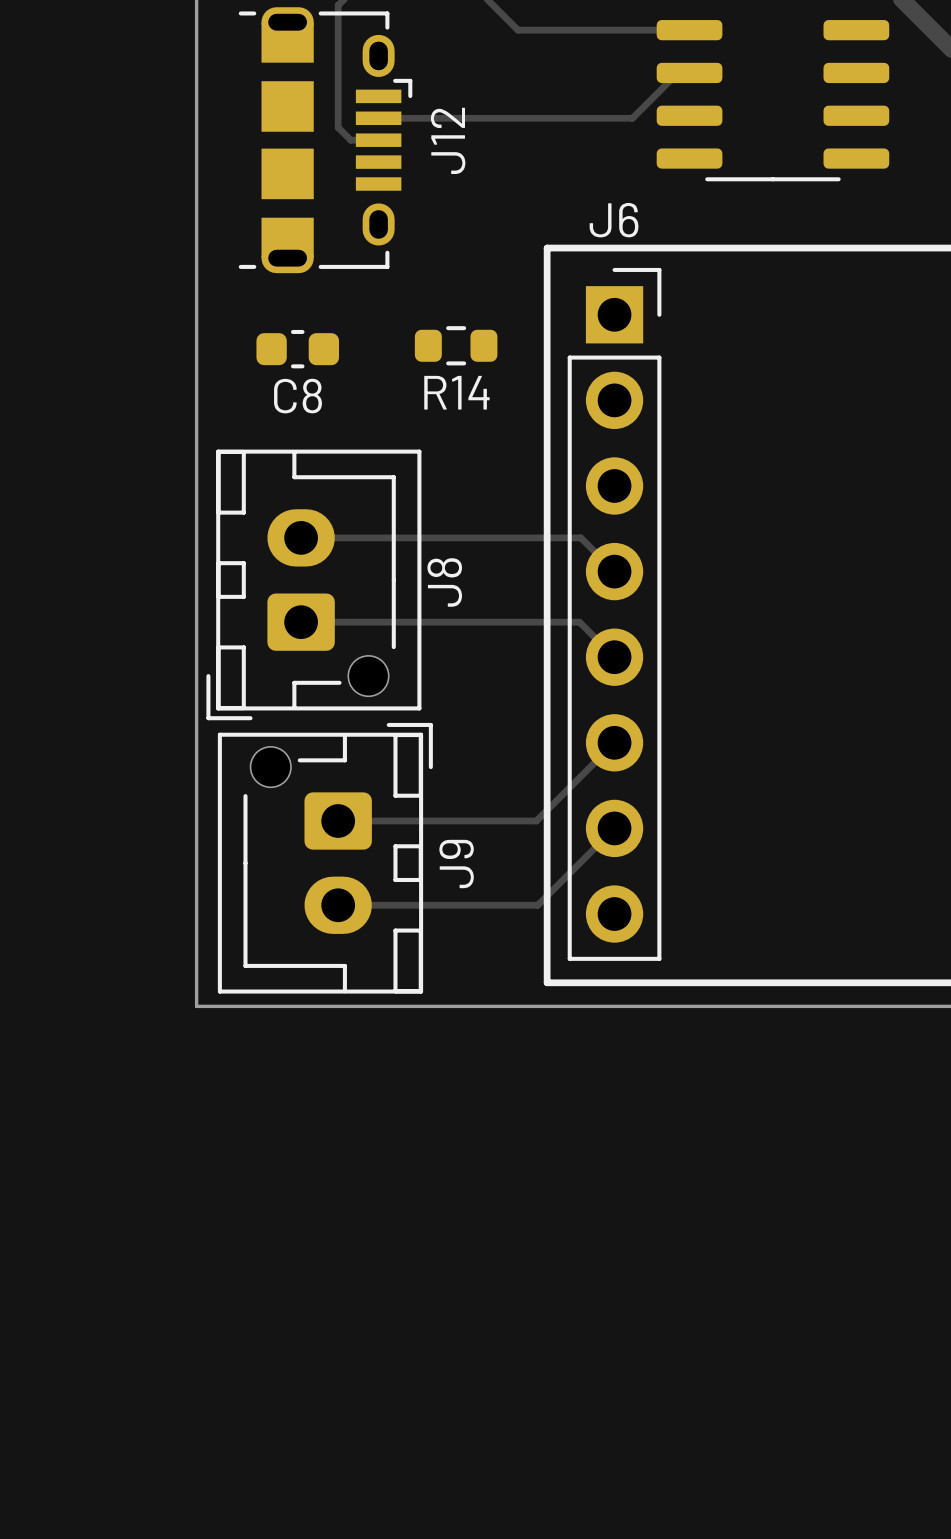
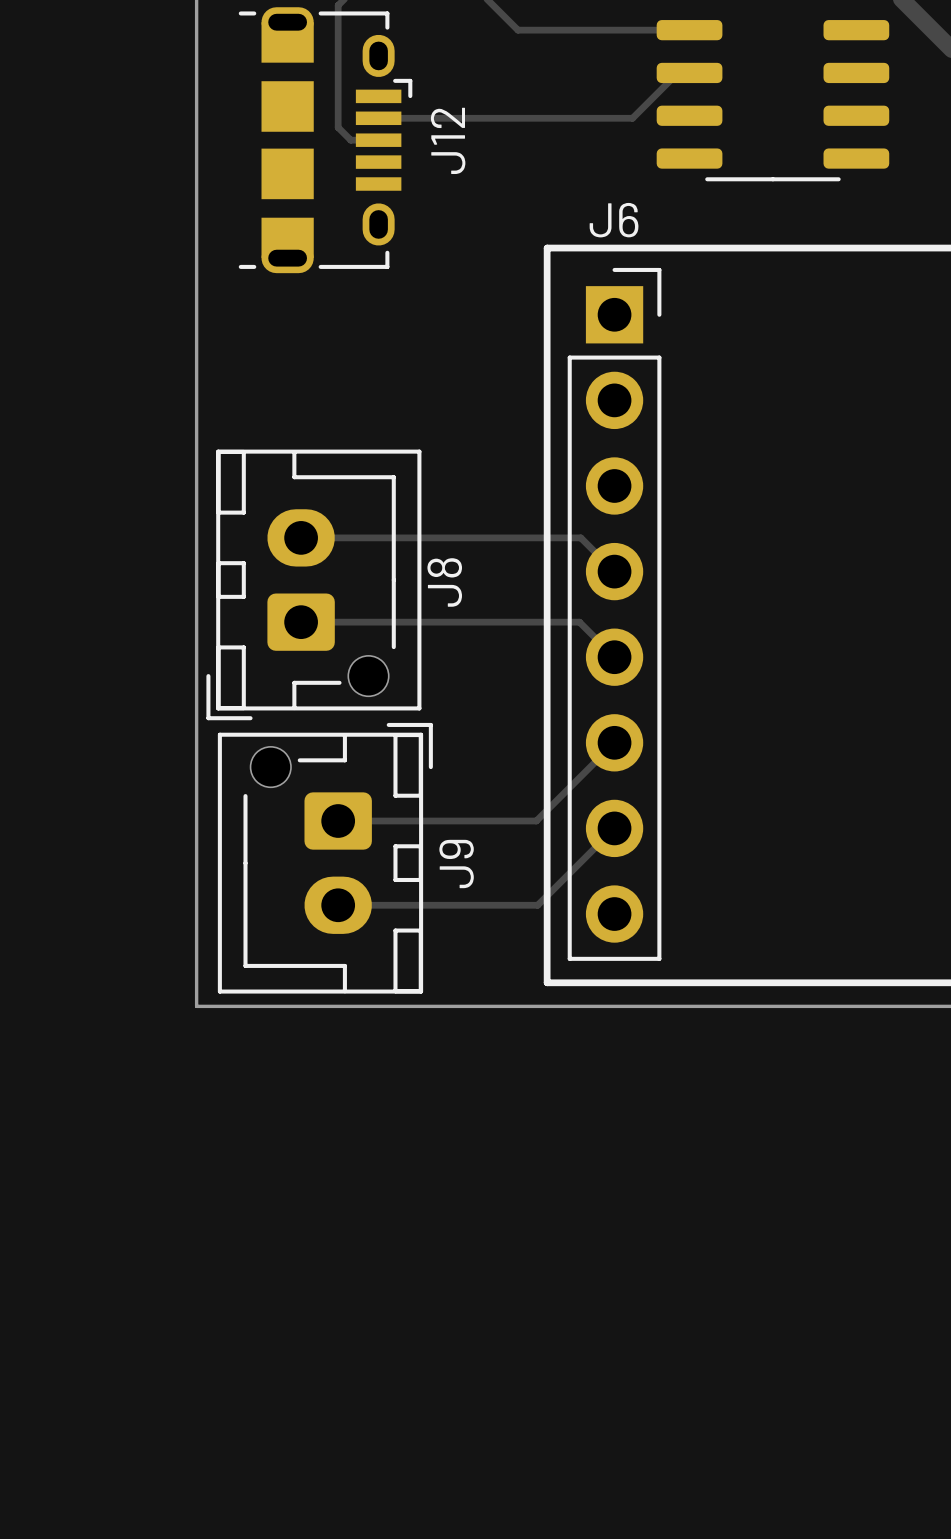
R14: (456, 345) -> none
C8: (297, 349) -> none

